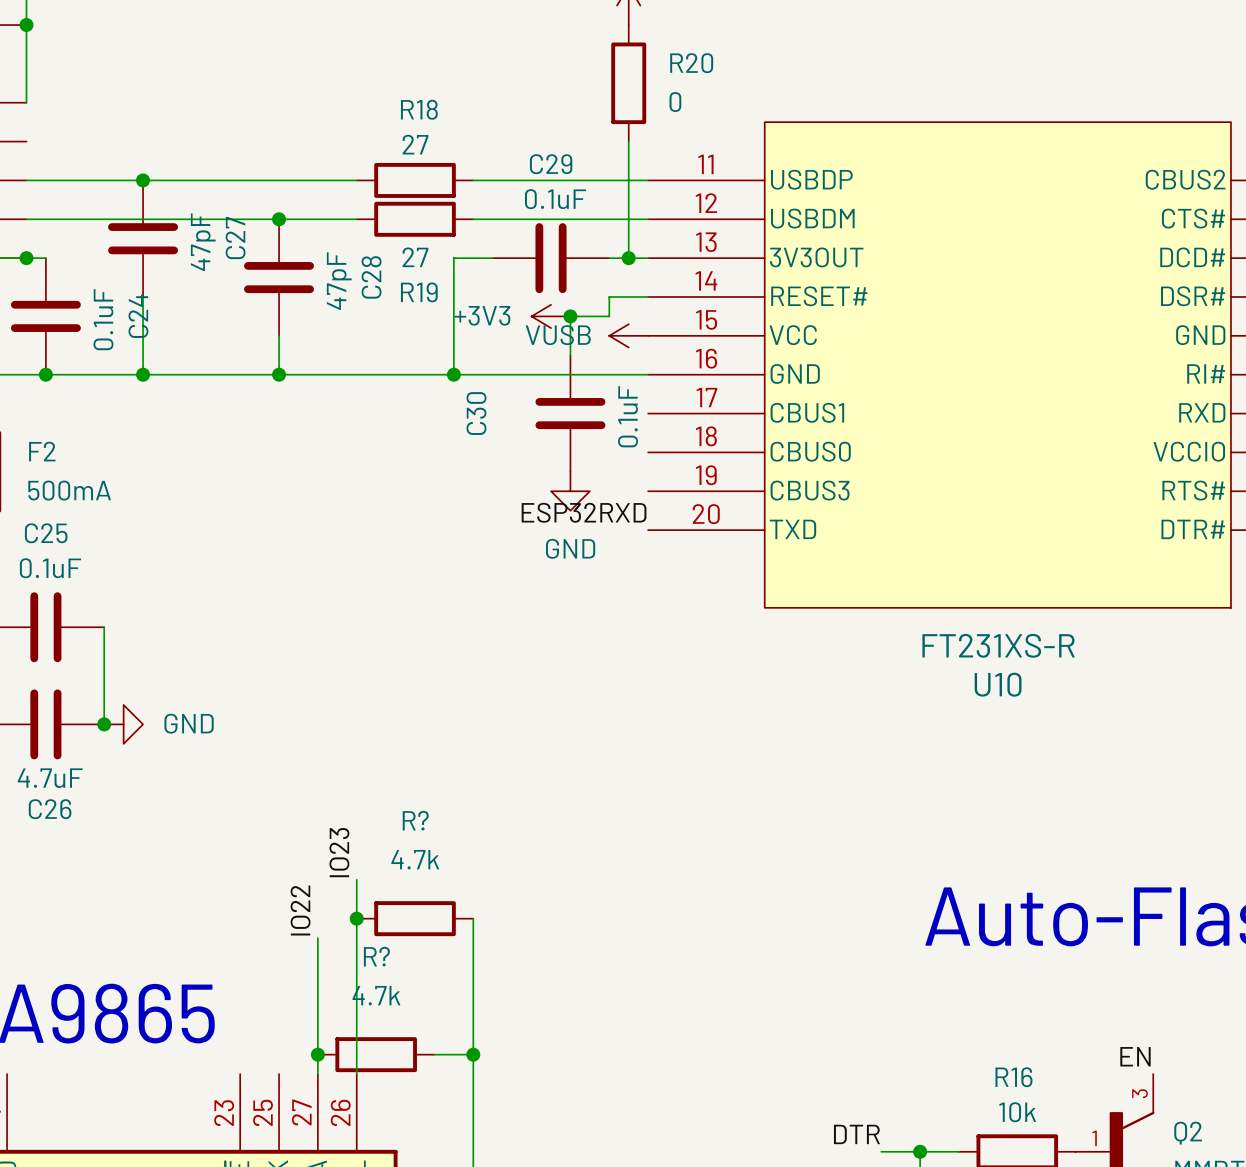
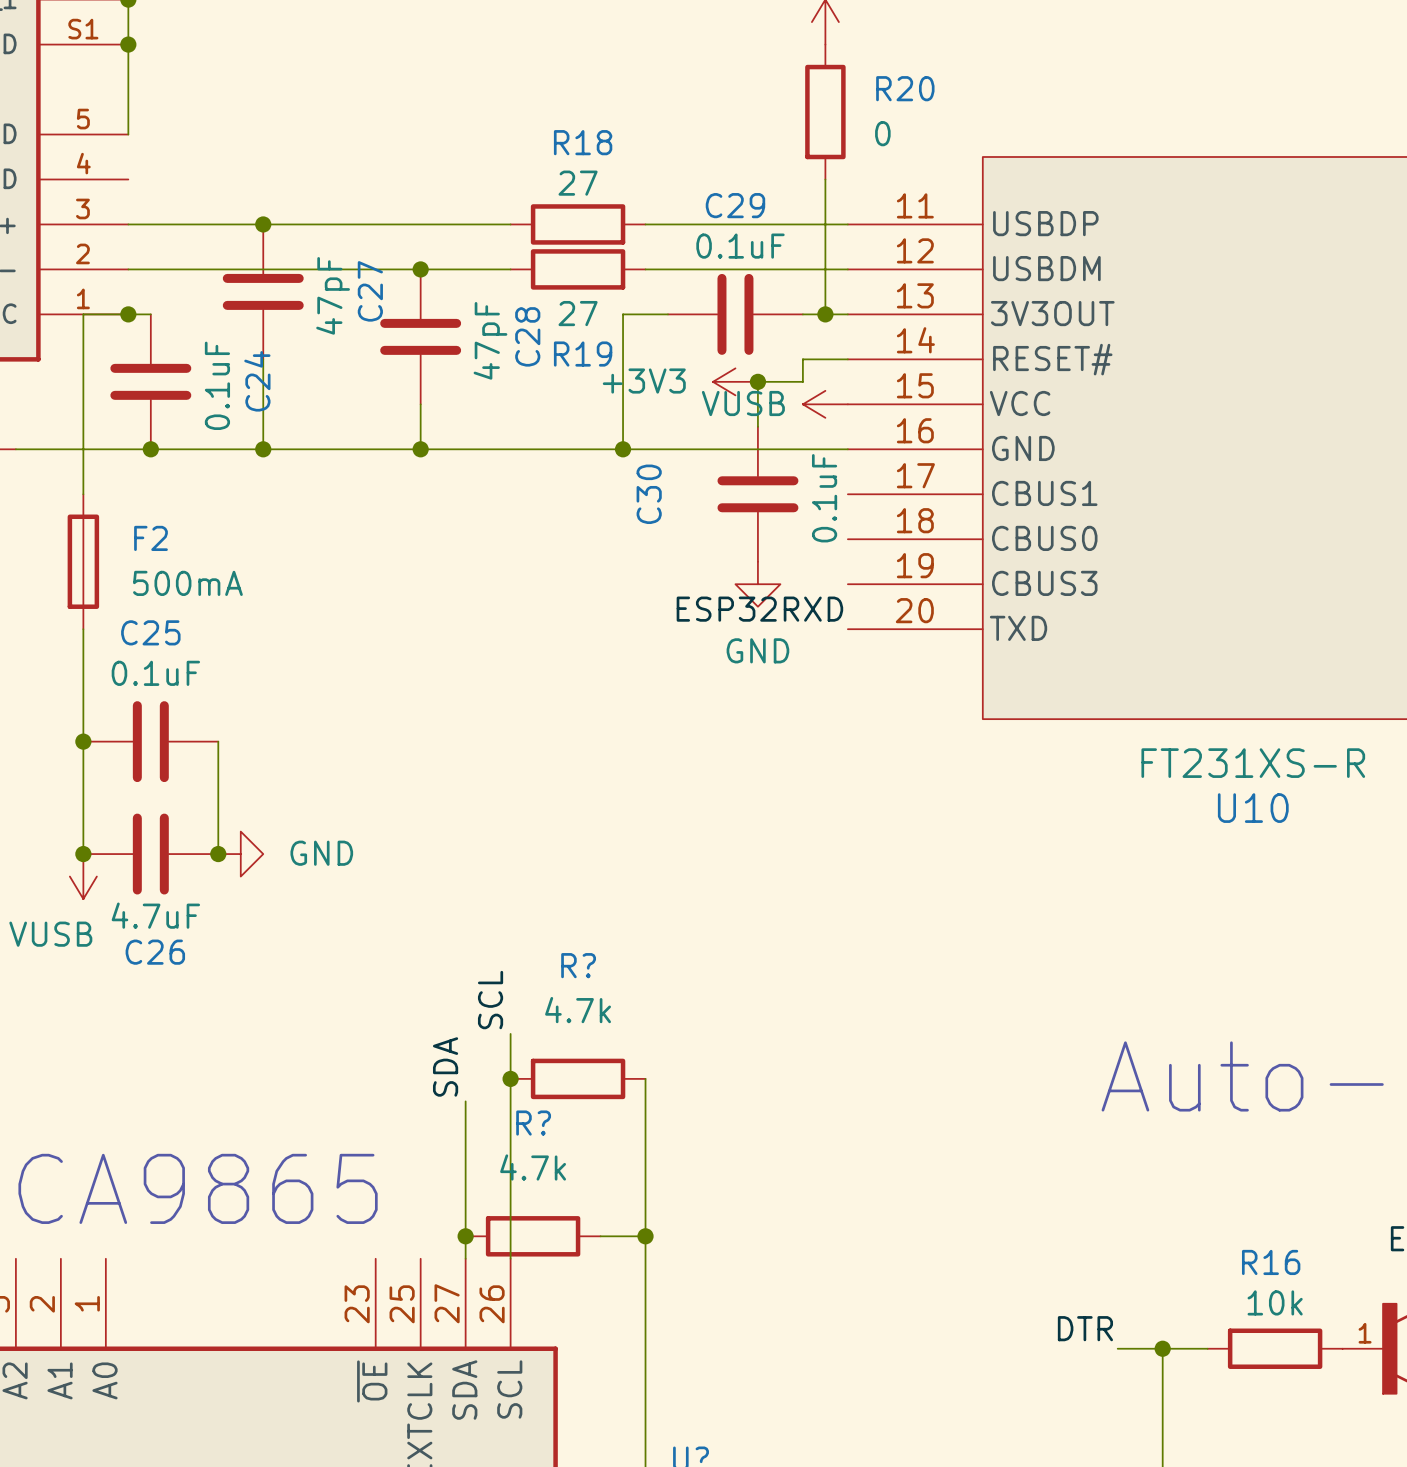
label: IO23 (339, 852) -> SCL (490, 1000)
label: IO22 (300, 910) -> SDA (445, 1066)

